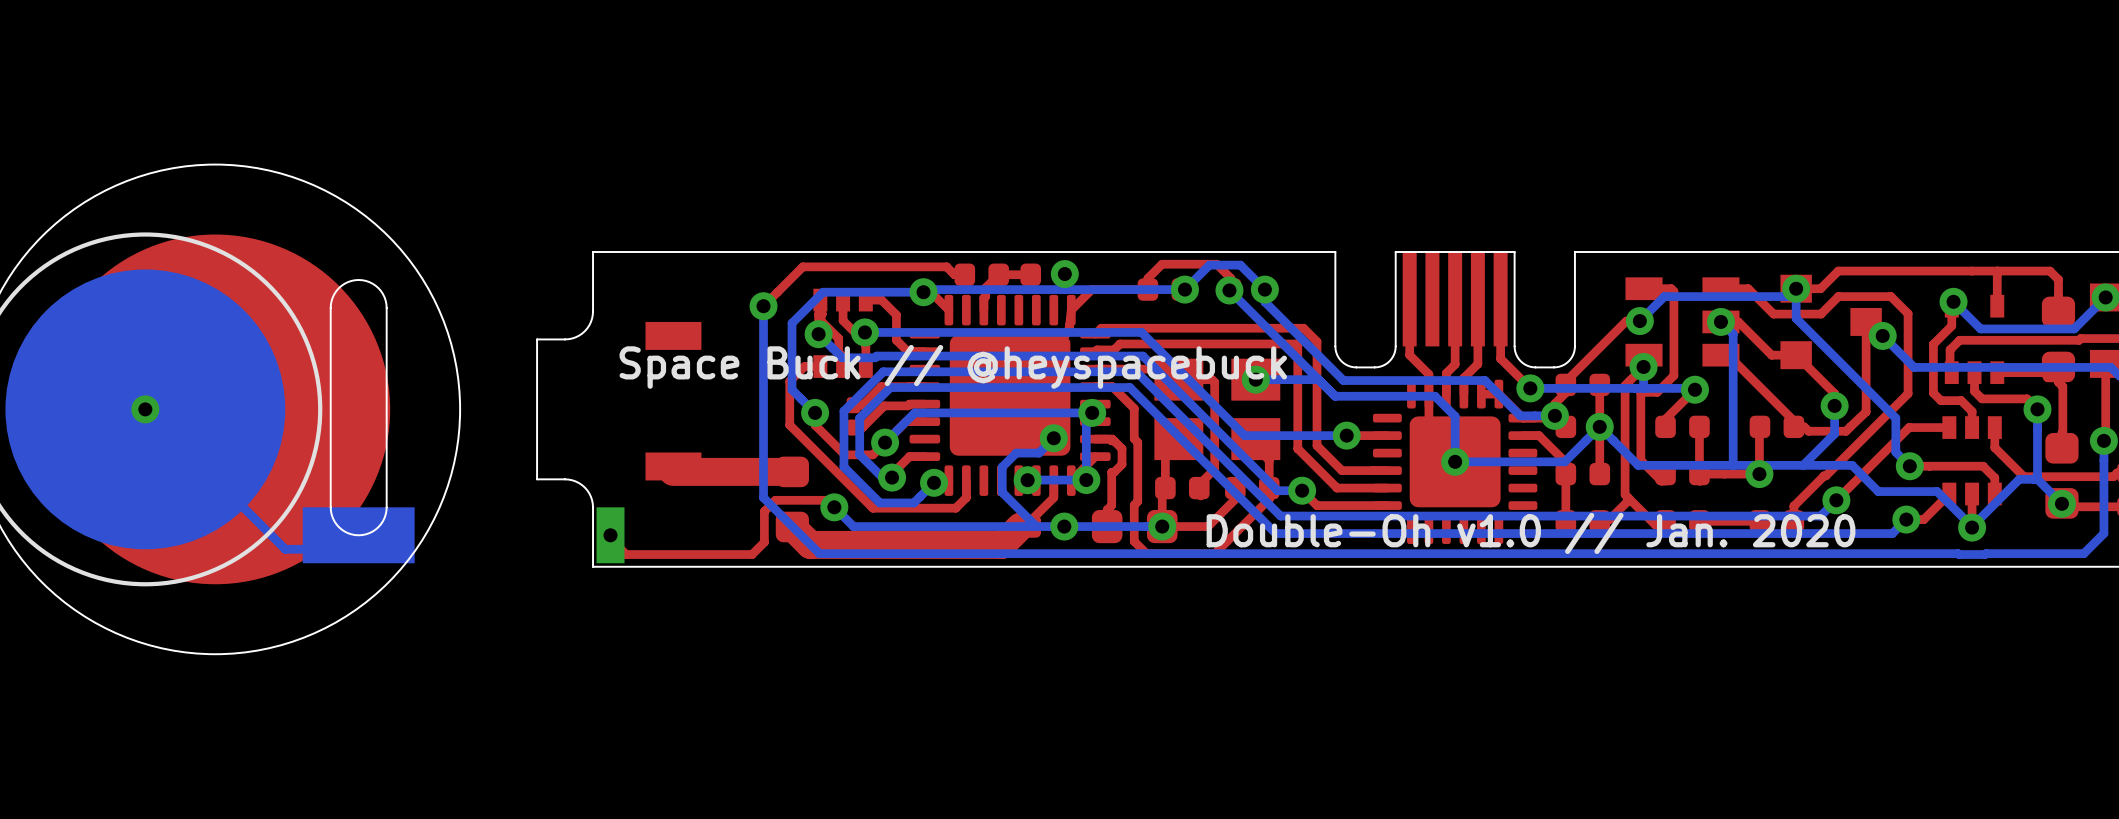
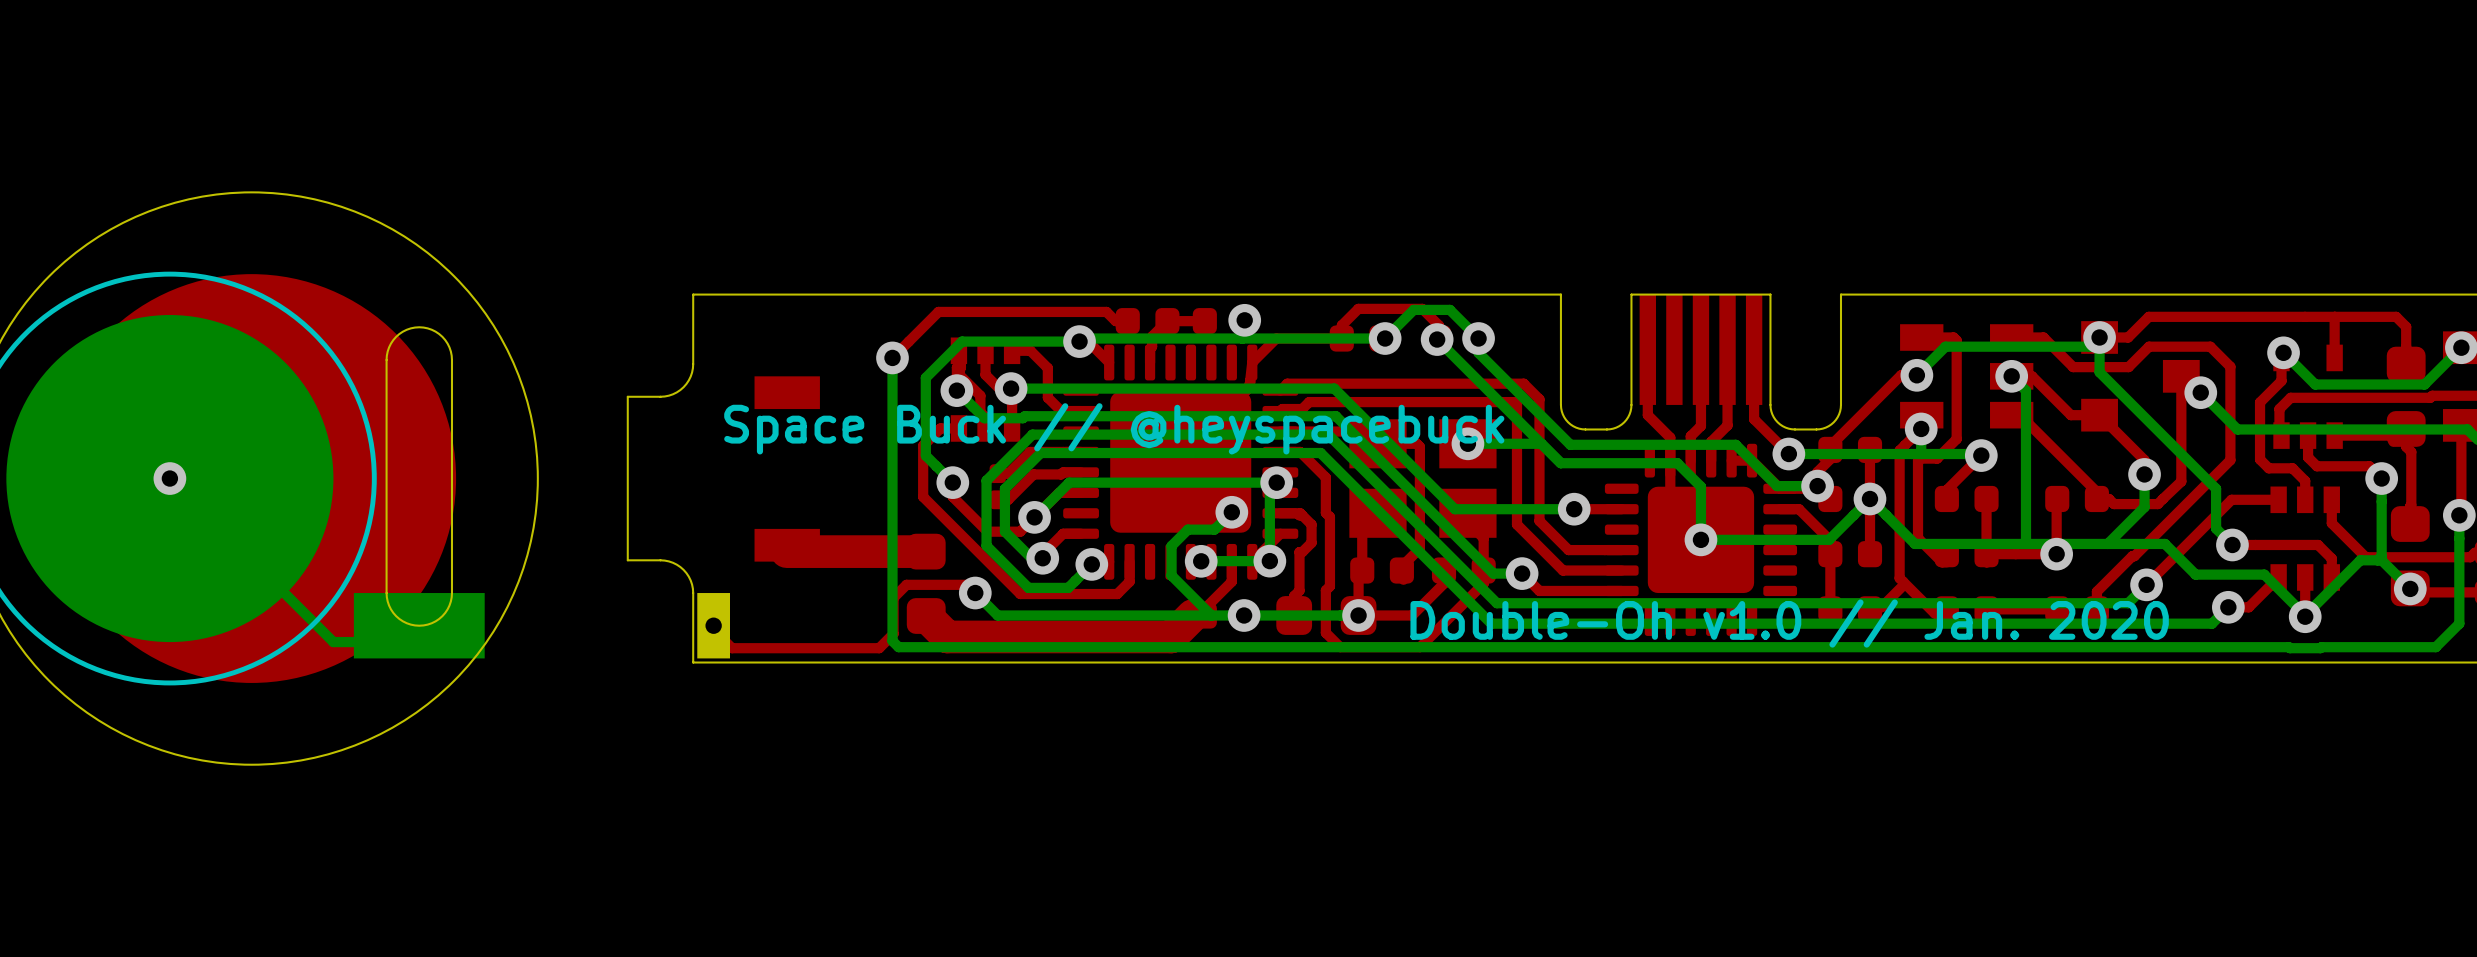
bottom track: (763, 497) (819, 553) -> (892, 581) (892, 641) (898, 647) (957, 647)

